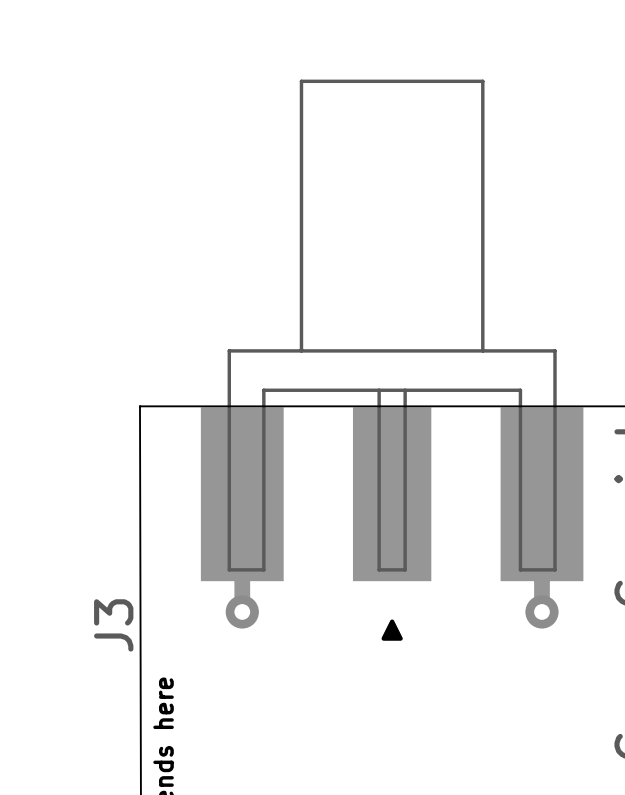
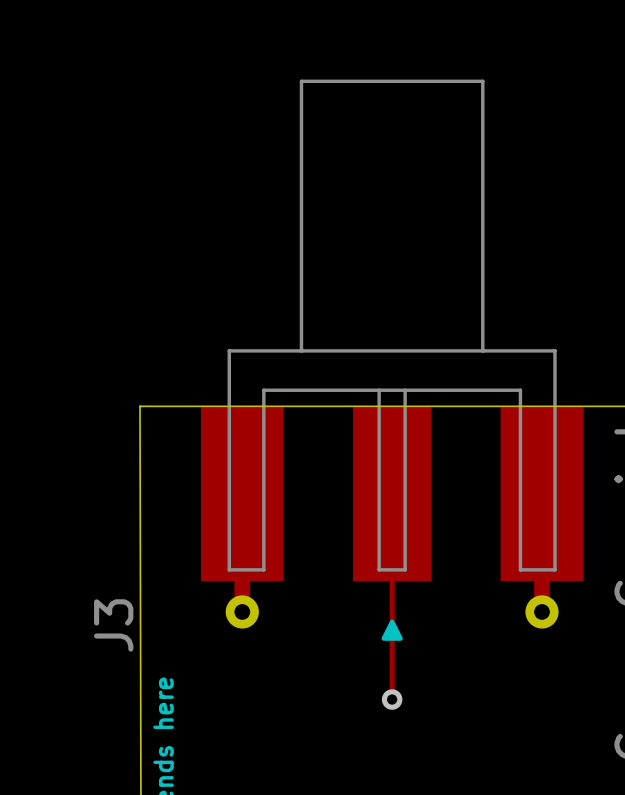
track: none -> (392, 494) (392, 699)
via: none -> (392, 699)

